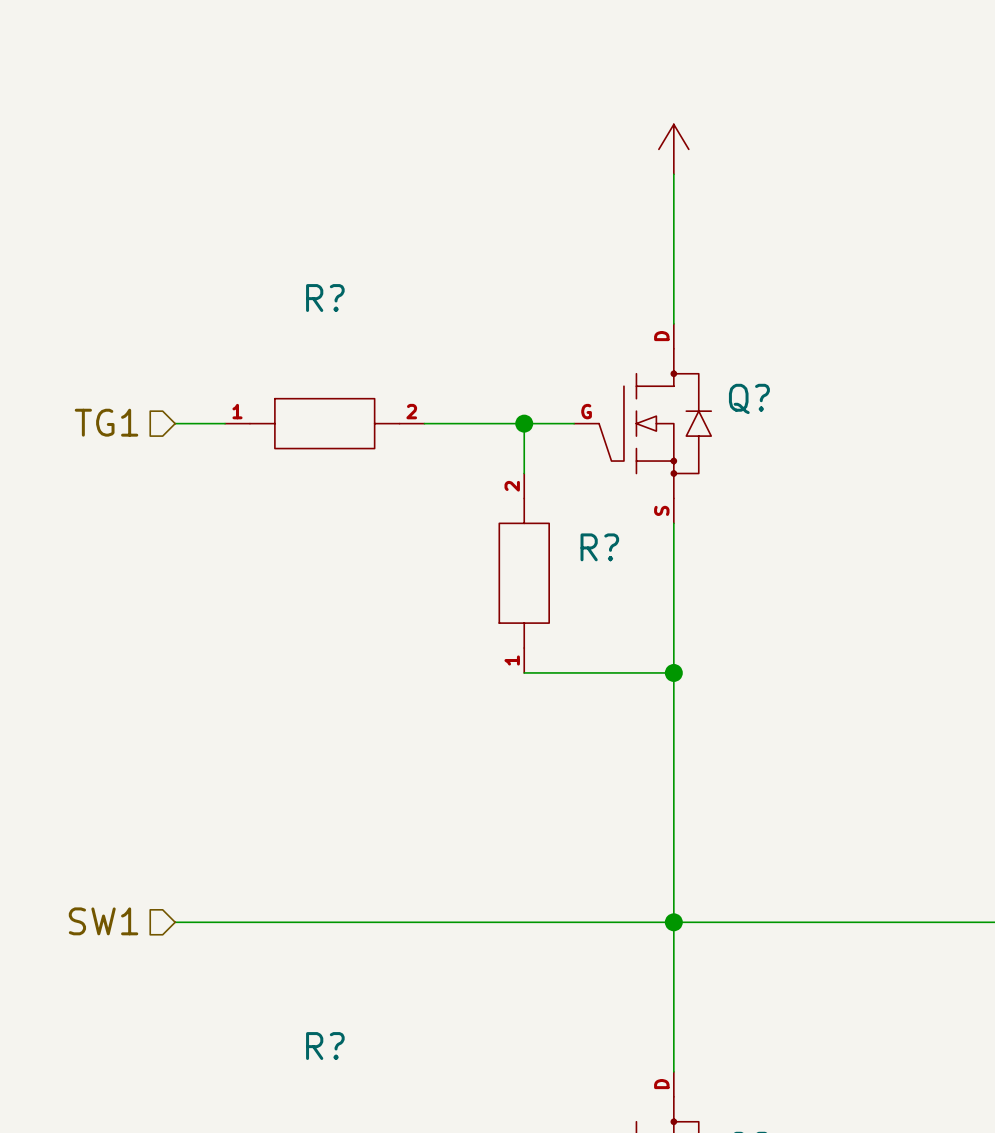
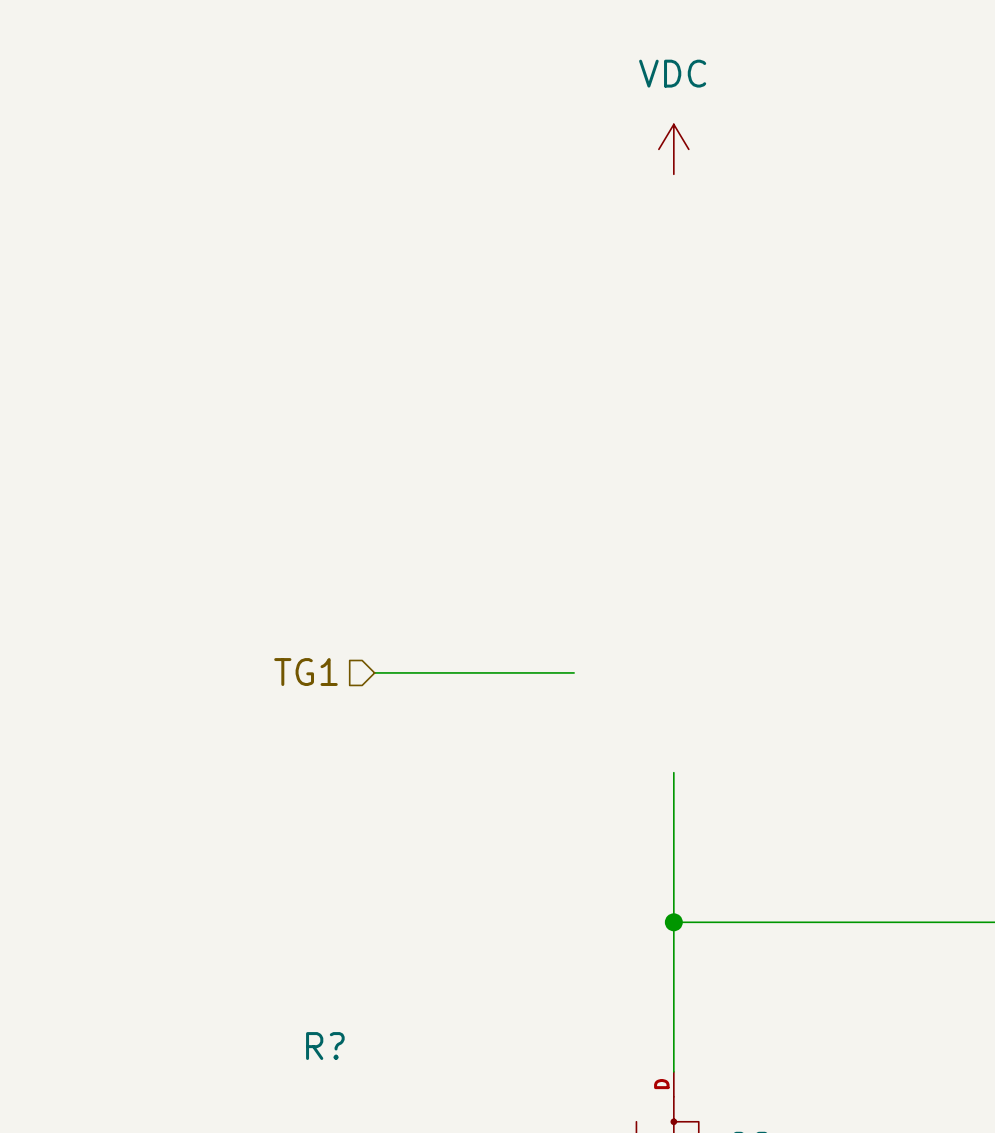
power symbol text: none -> VDC (672, 73)
wire: (673, 174) (673, 323) -> none
hierarchical label position: TG1 (106, 422) -> TG1 (305, 672)
wire: (175, 423) (225, 423) -> none
R?: (324, 423) -> none
wire: (424, 423) (574, 423) -> (374, 672) (524, 672)
wire: (524, 423) (524, 473) -> none
junction: (524, 423) -> none
Q?: (642, 423) -> none
wire: (673, 523) (673, 772) -> none
R?: (524, 573) -> none
wire: (574, 672) (673, 672) -> none
junction: (673, 672) -> none
hierarchical label: SW1 (103, 921) -> none
wire: (175, 922) (673, 922) -> none

